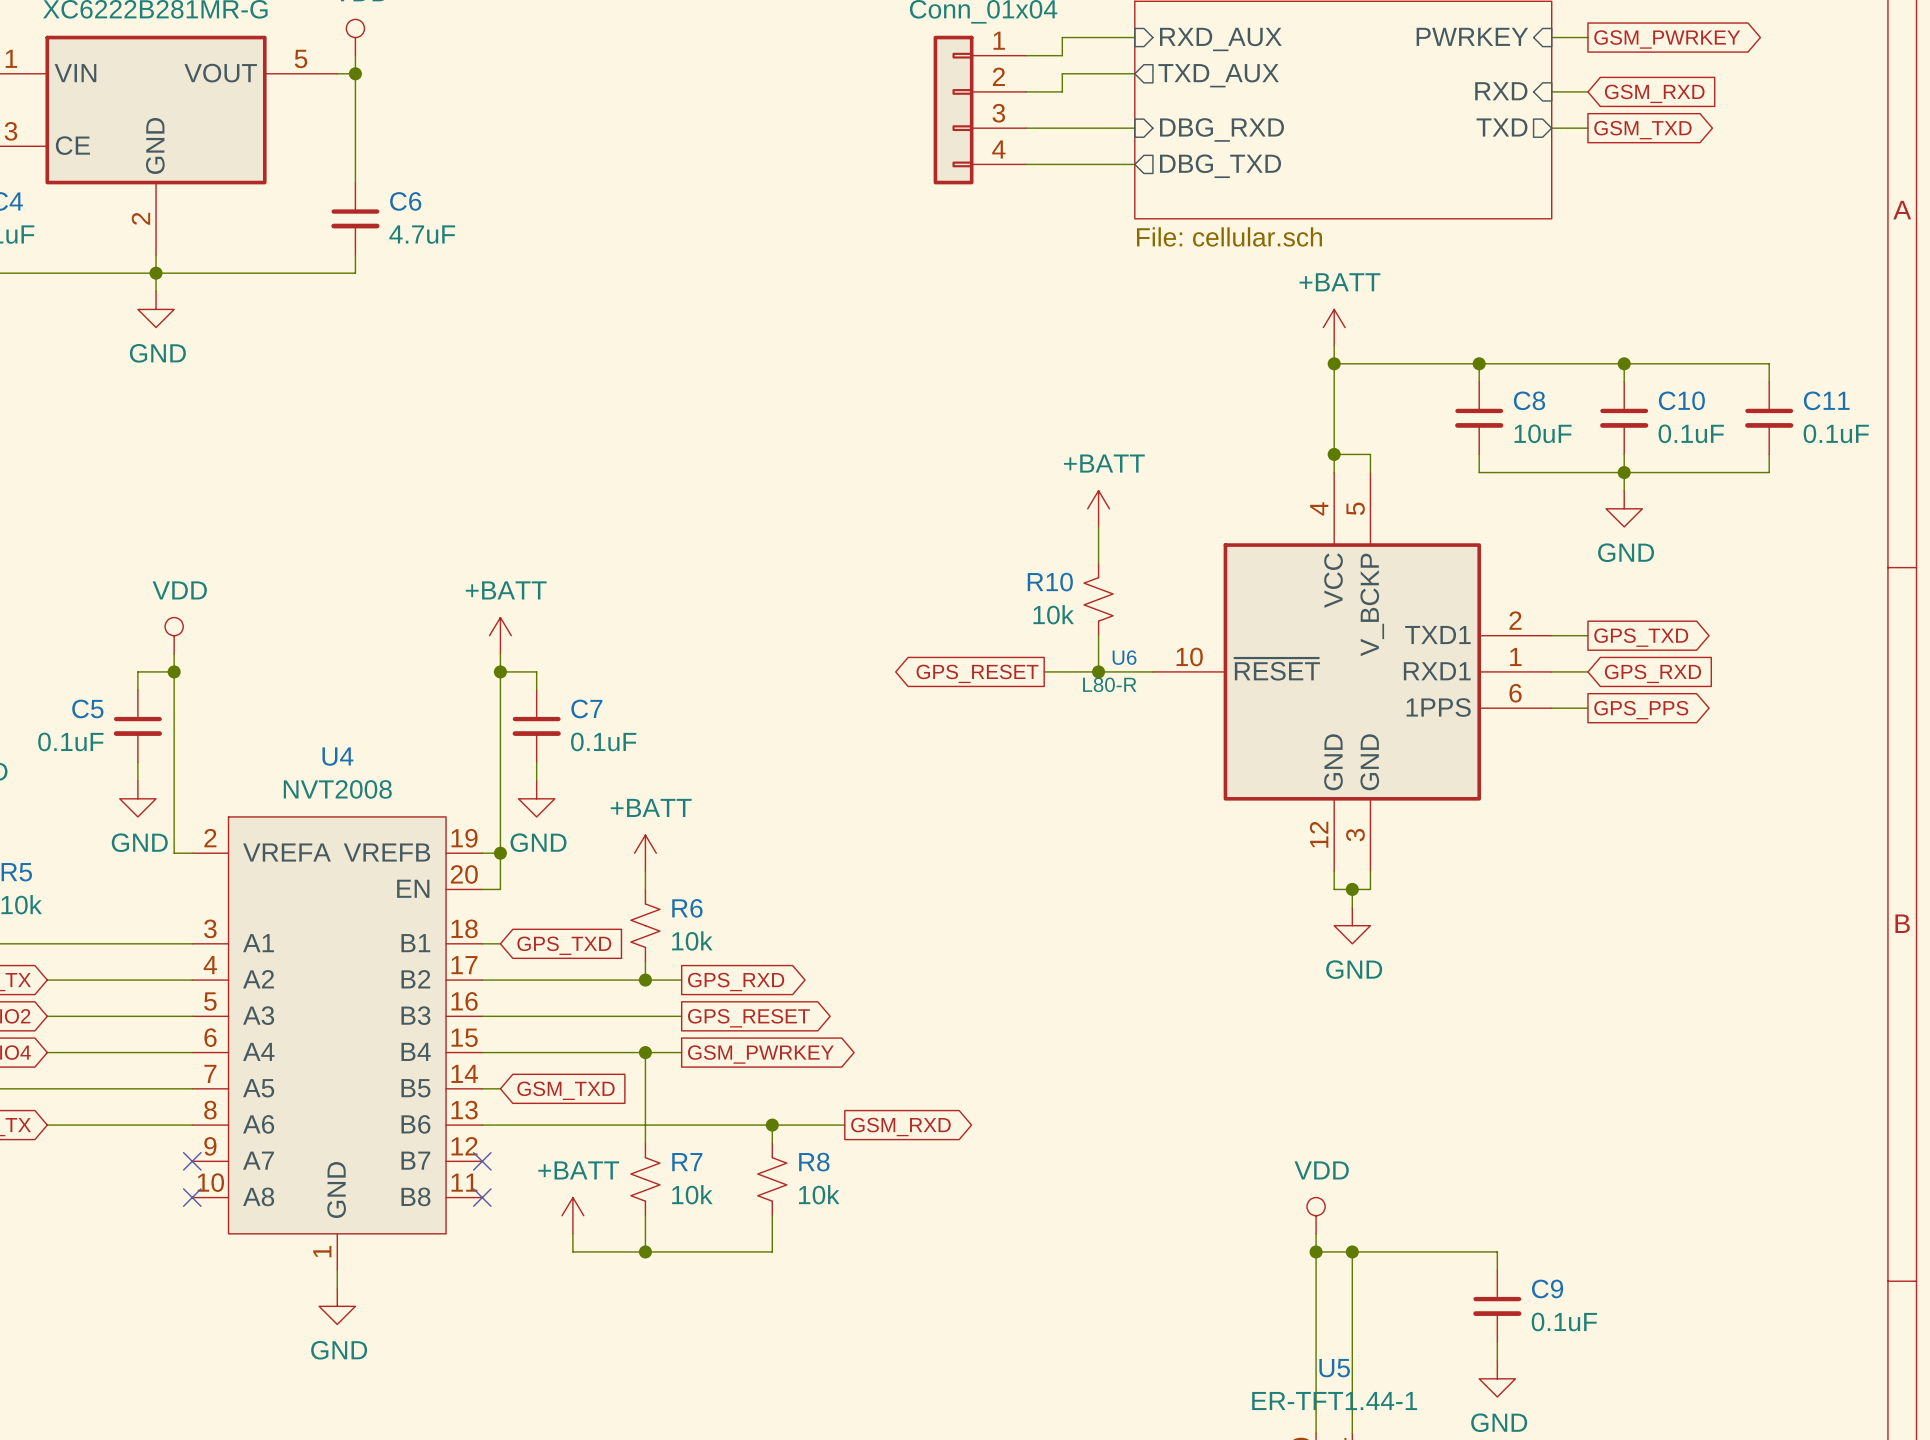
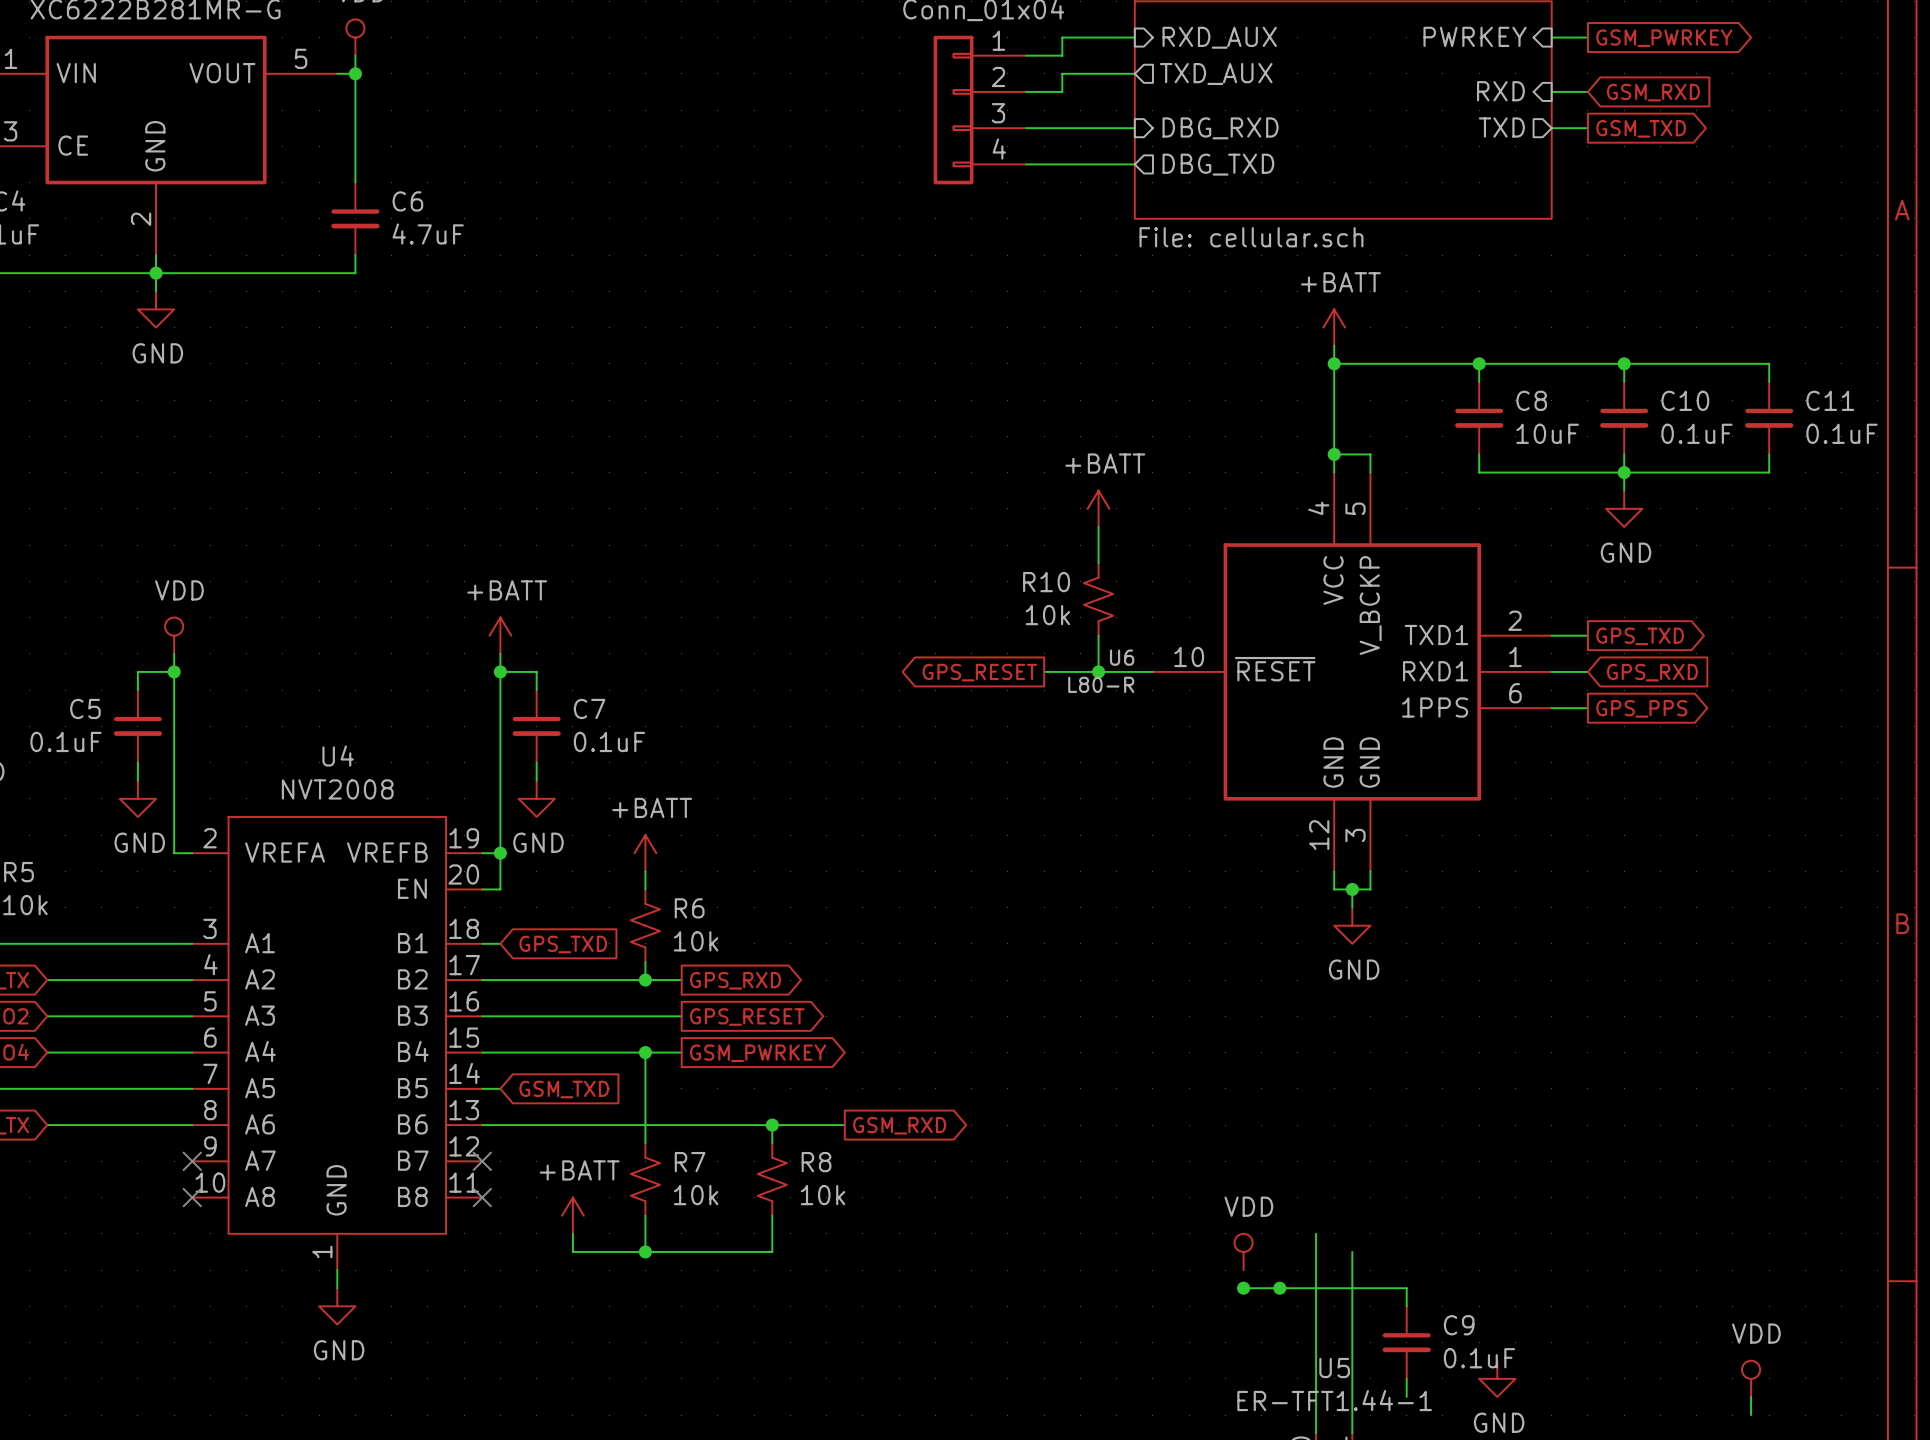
power symbol position: VDD (1316, 1215) -> VDD (1243, 1251)
wire: (1316, 1251) (1497, 1251) (1497, 1270) -> none
junction: (1316, 1251) -> none
junction: (1352, 1251) -> none
wire: none -> (1243, 1288) (1406, 1288) (1406, 1306)
junction: none -> (1243, 1288)
junction: none -> (1279, 1288)
C9 position: (1497, 1306) -> (1406, 1342)
wire: (1497, 1342) (1497, 1360) -> (1406, 1378) (1406, 1396)
power symbol: none -> VDD (1751, 1378)
wire: none -> (1751, 1396) (1751, 1415)

